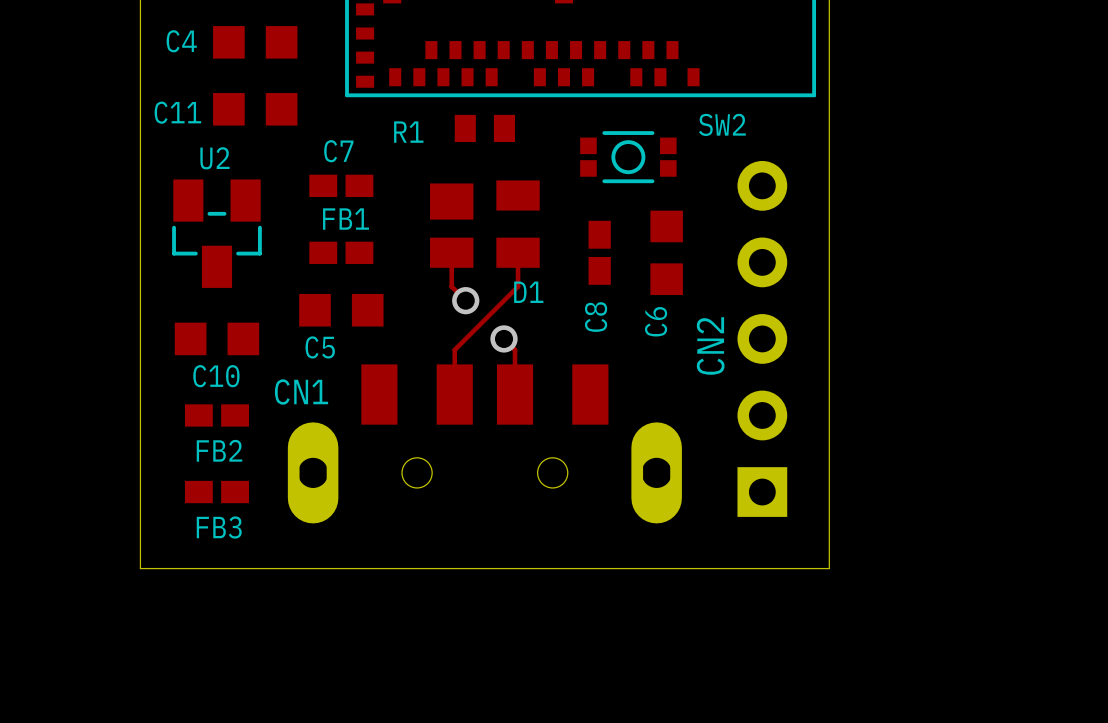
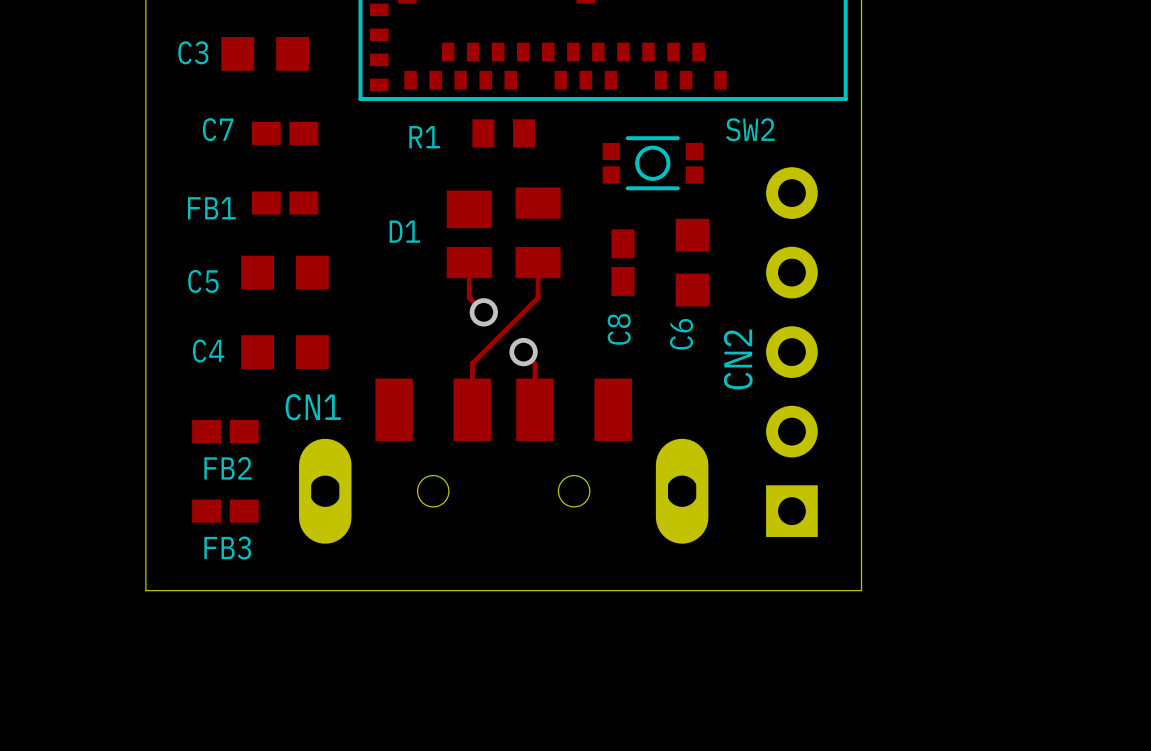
C4 position: (255, 42) -> (285, 352)
C3: none -> (265, 53)
C11: (255, 109) -> none
C7 name position: C7 (338, 151) -> C7 (218, 129)
C7 position: (341, 185) -> (285, 133)
FB1 name position: FB1 (346, 219) -> FB1 (211, 208)
U2: (216, 233) -> none
FB1 position: (341, 252) -> (285, 203)
D1 name position: D1 (528, 292) -> D1 (404, 231)
C5 position: (341, 310) -> (285, 272)
C10: (216, 338) -> none
C5 name position: C5 (320, 347) -> C5 (203, 281)

